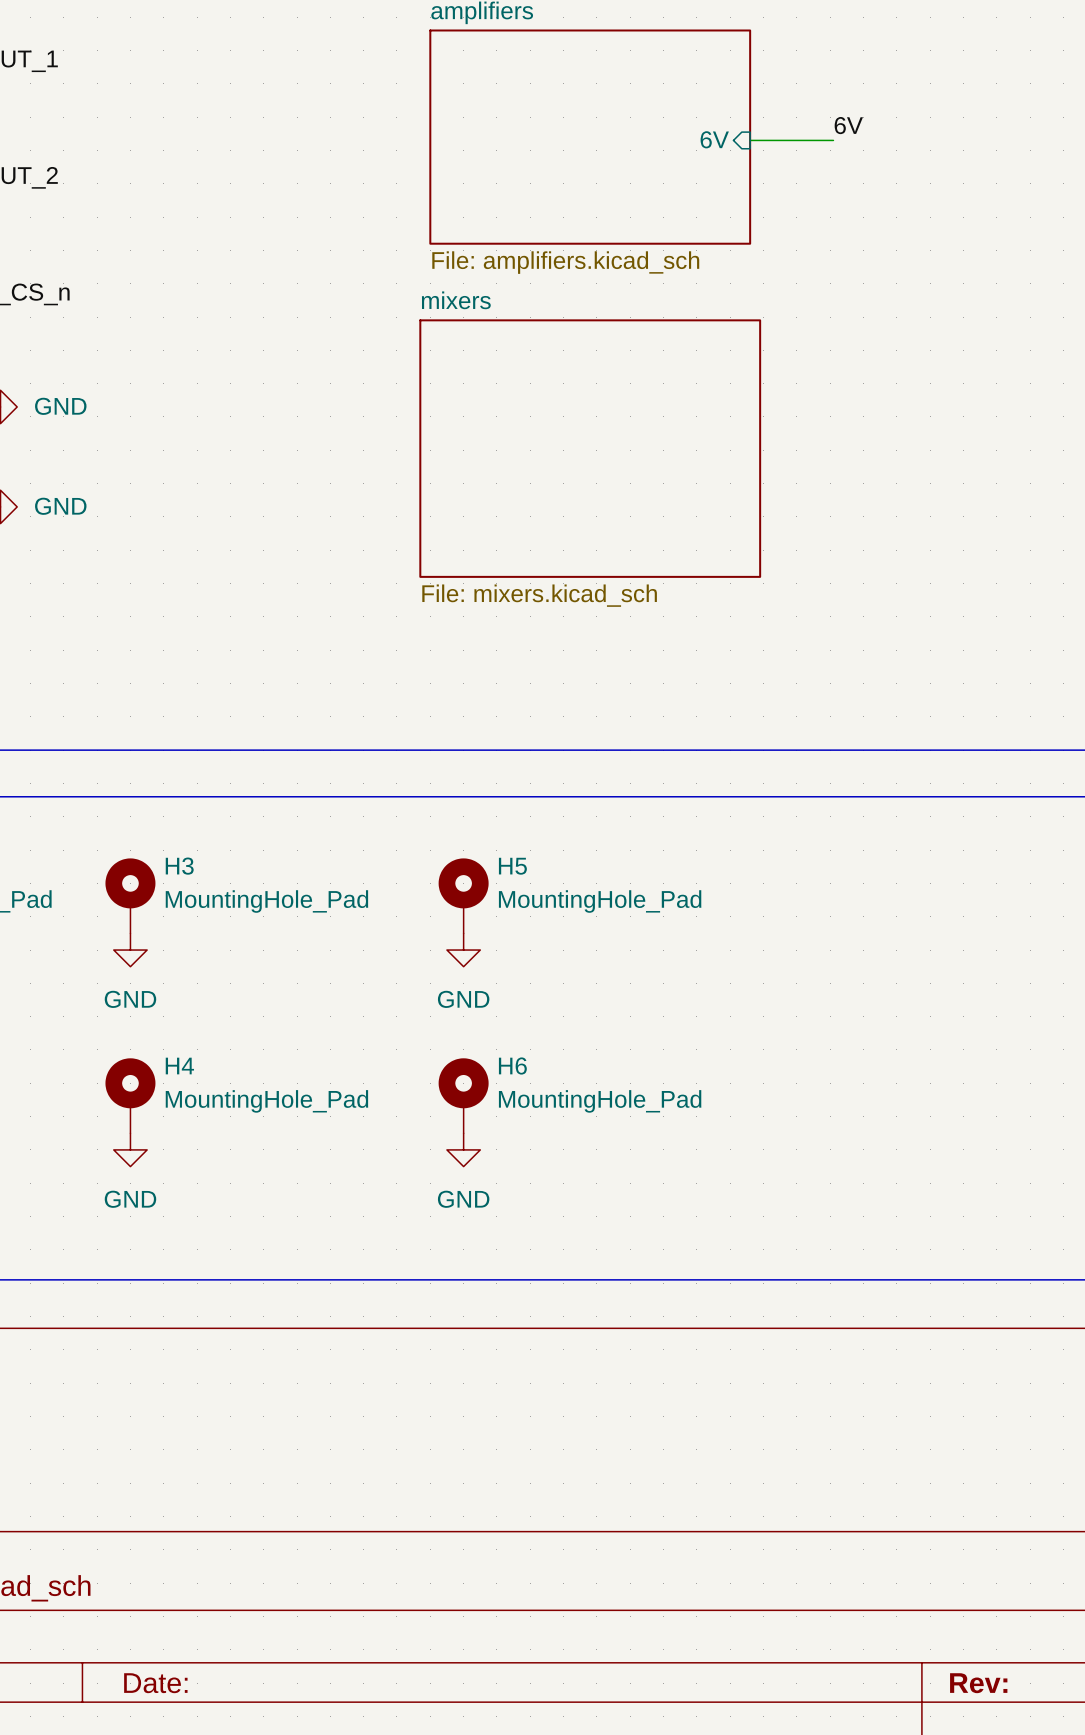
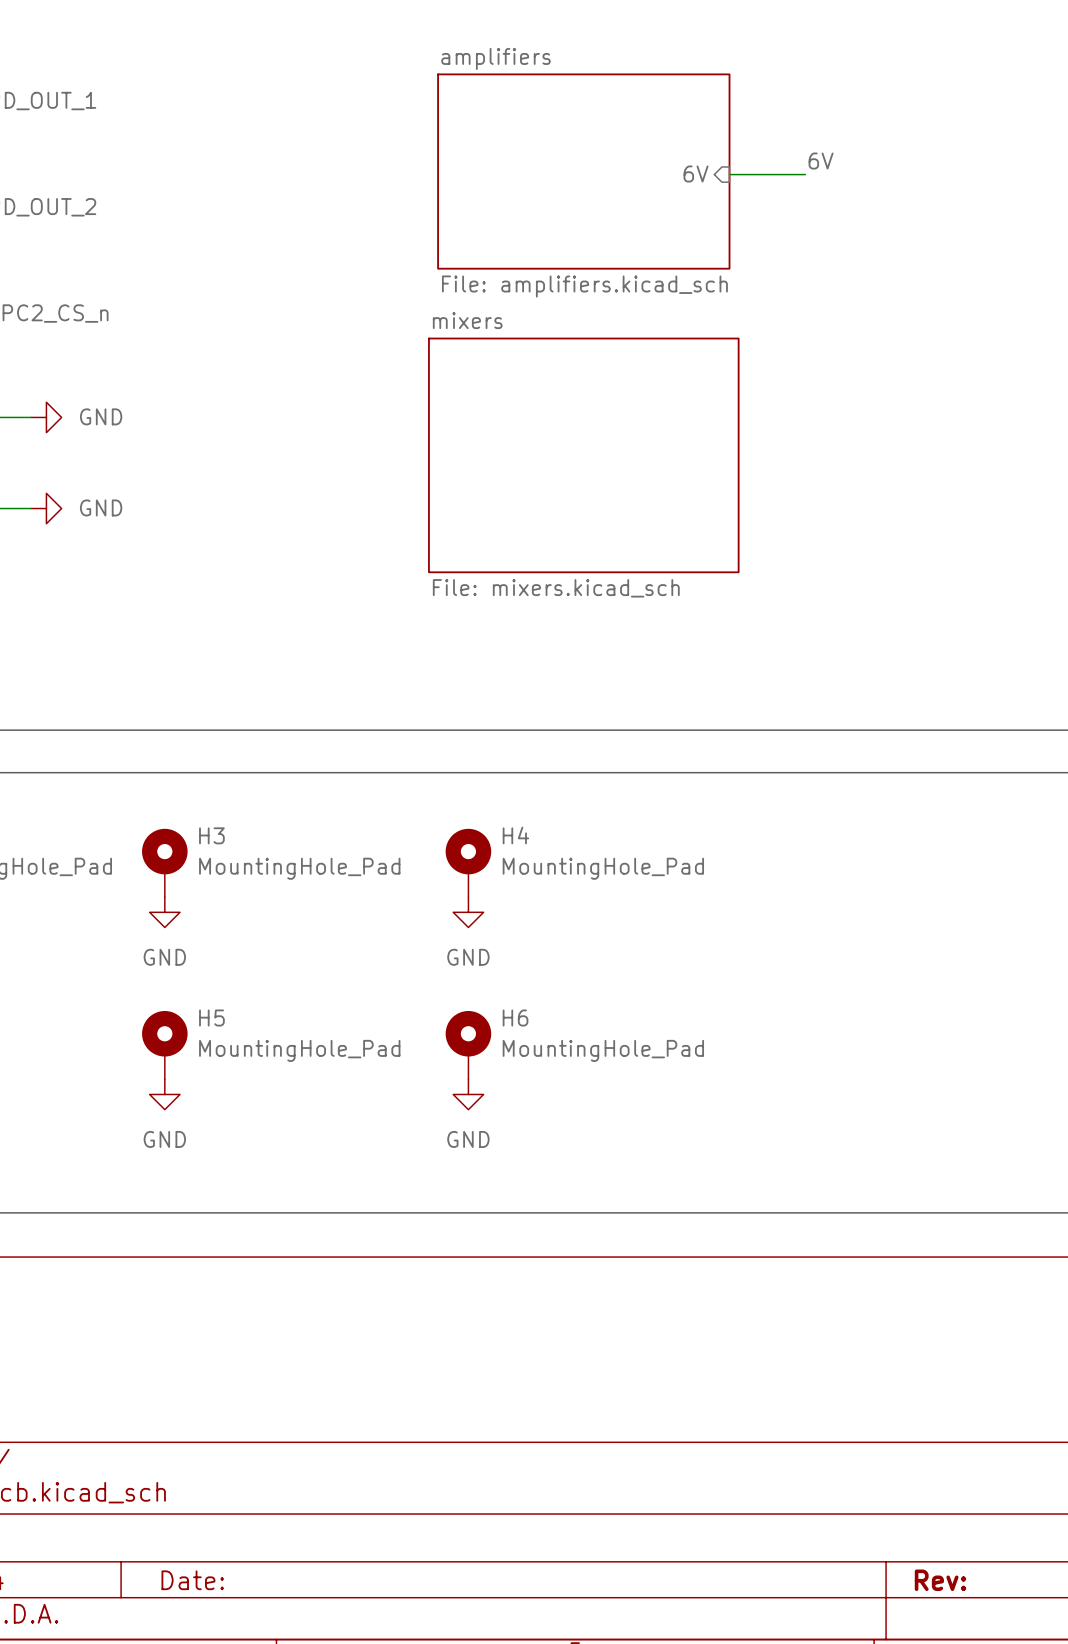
H5 name: H5 (512, 866) -> H4 (515, 835)
H4 name: H4 (179, 1066) -> H5 (211, 1018)

